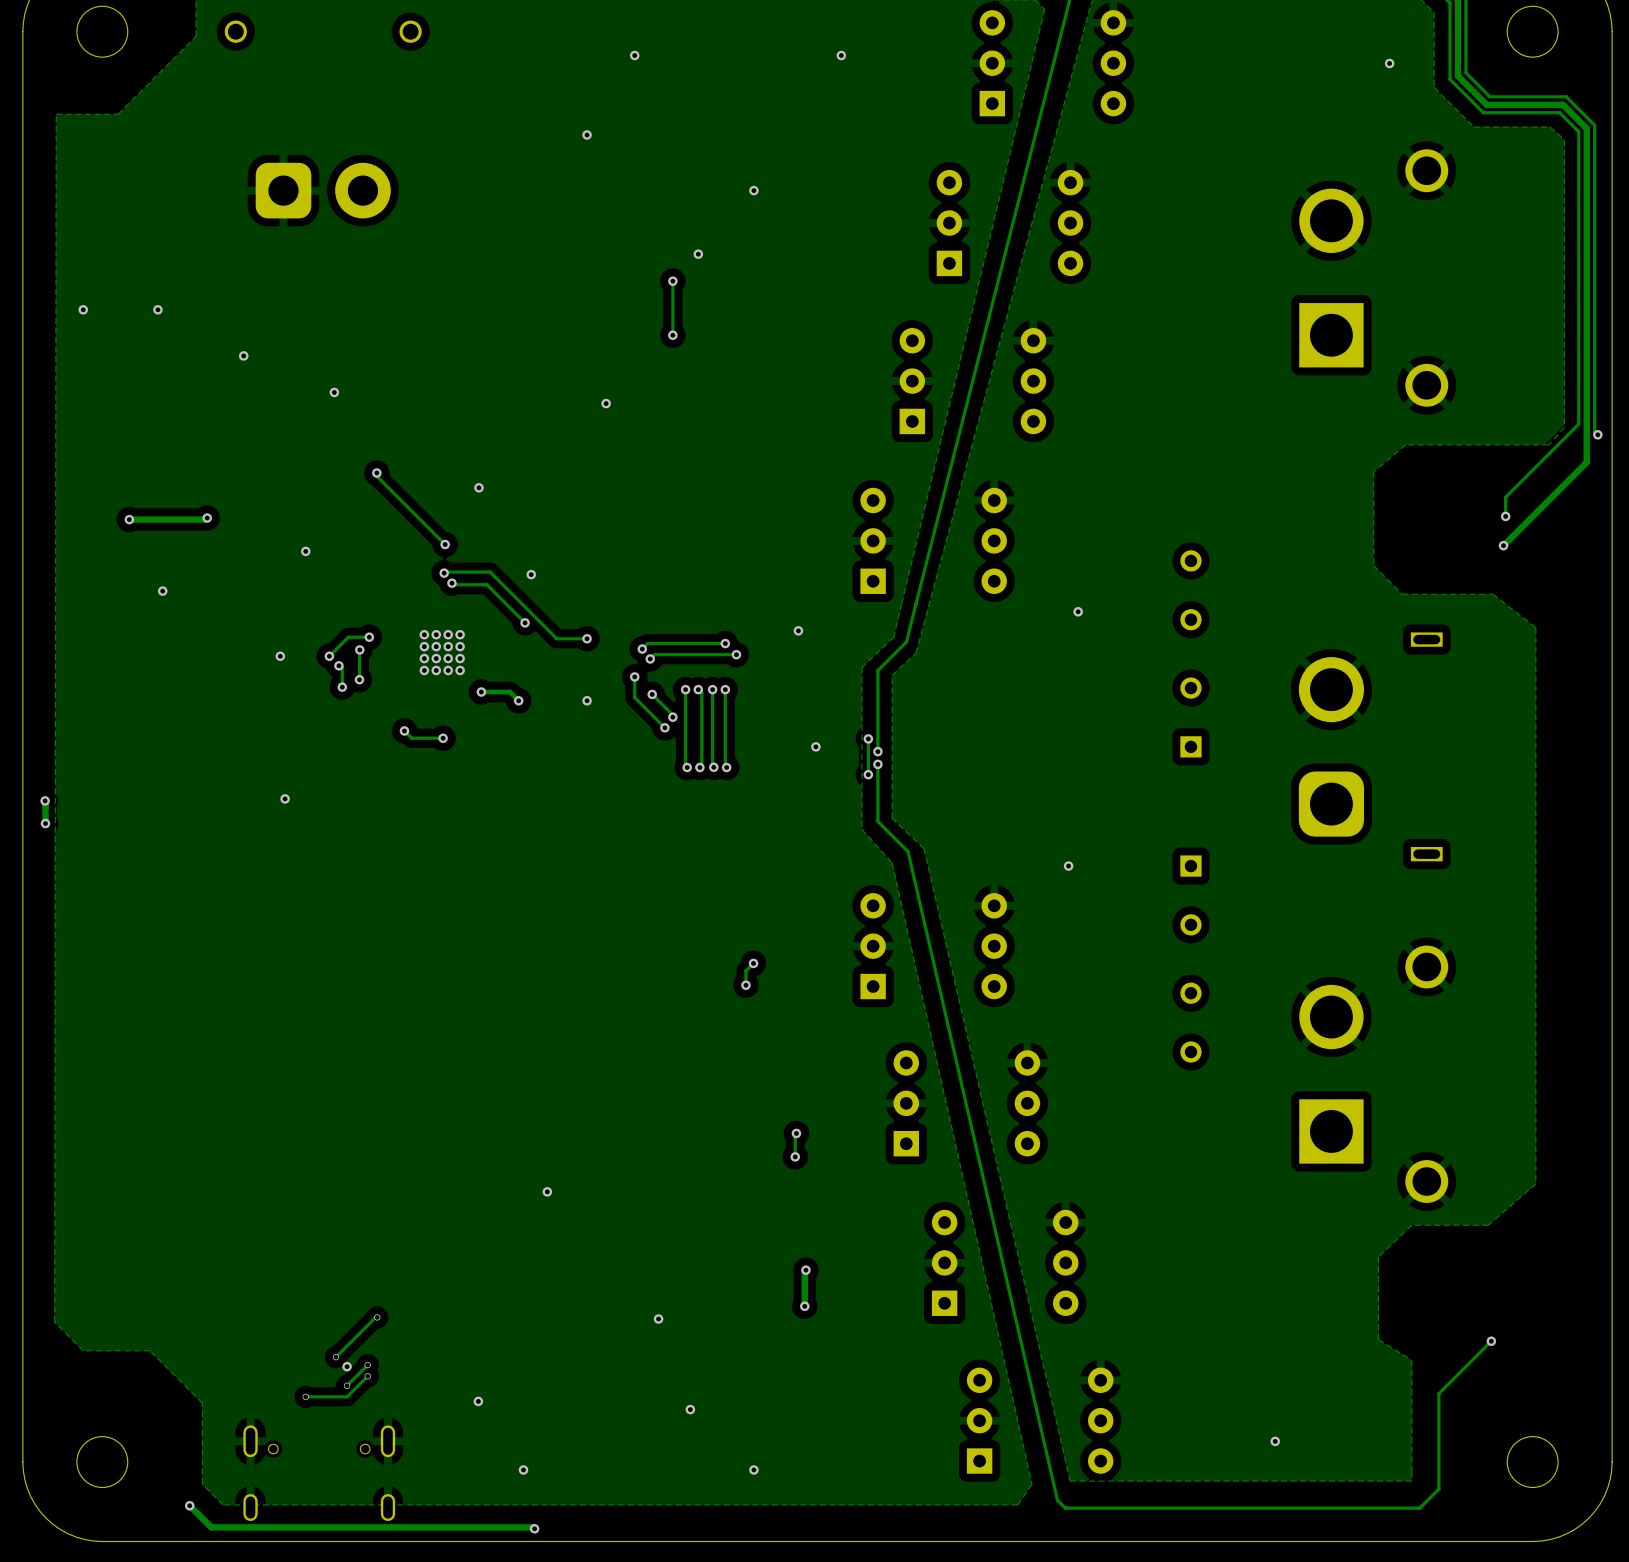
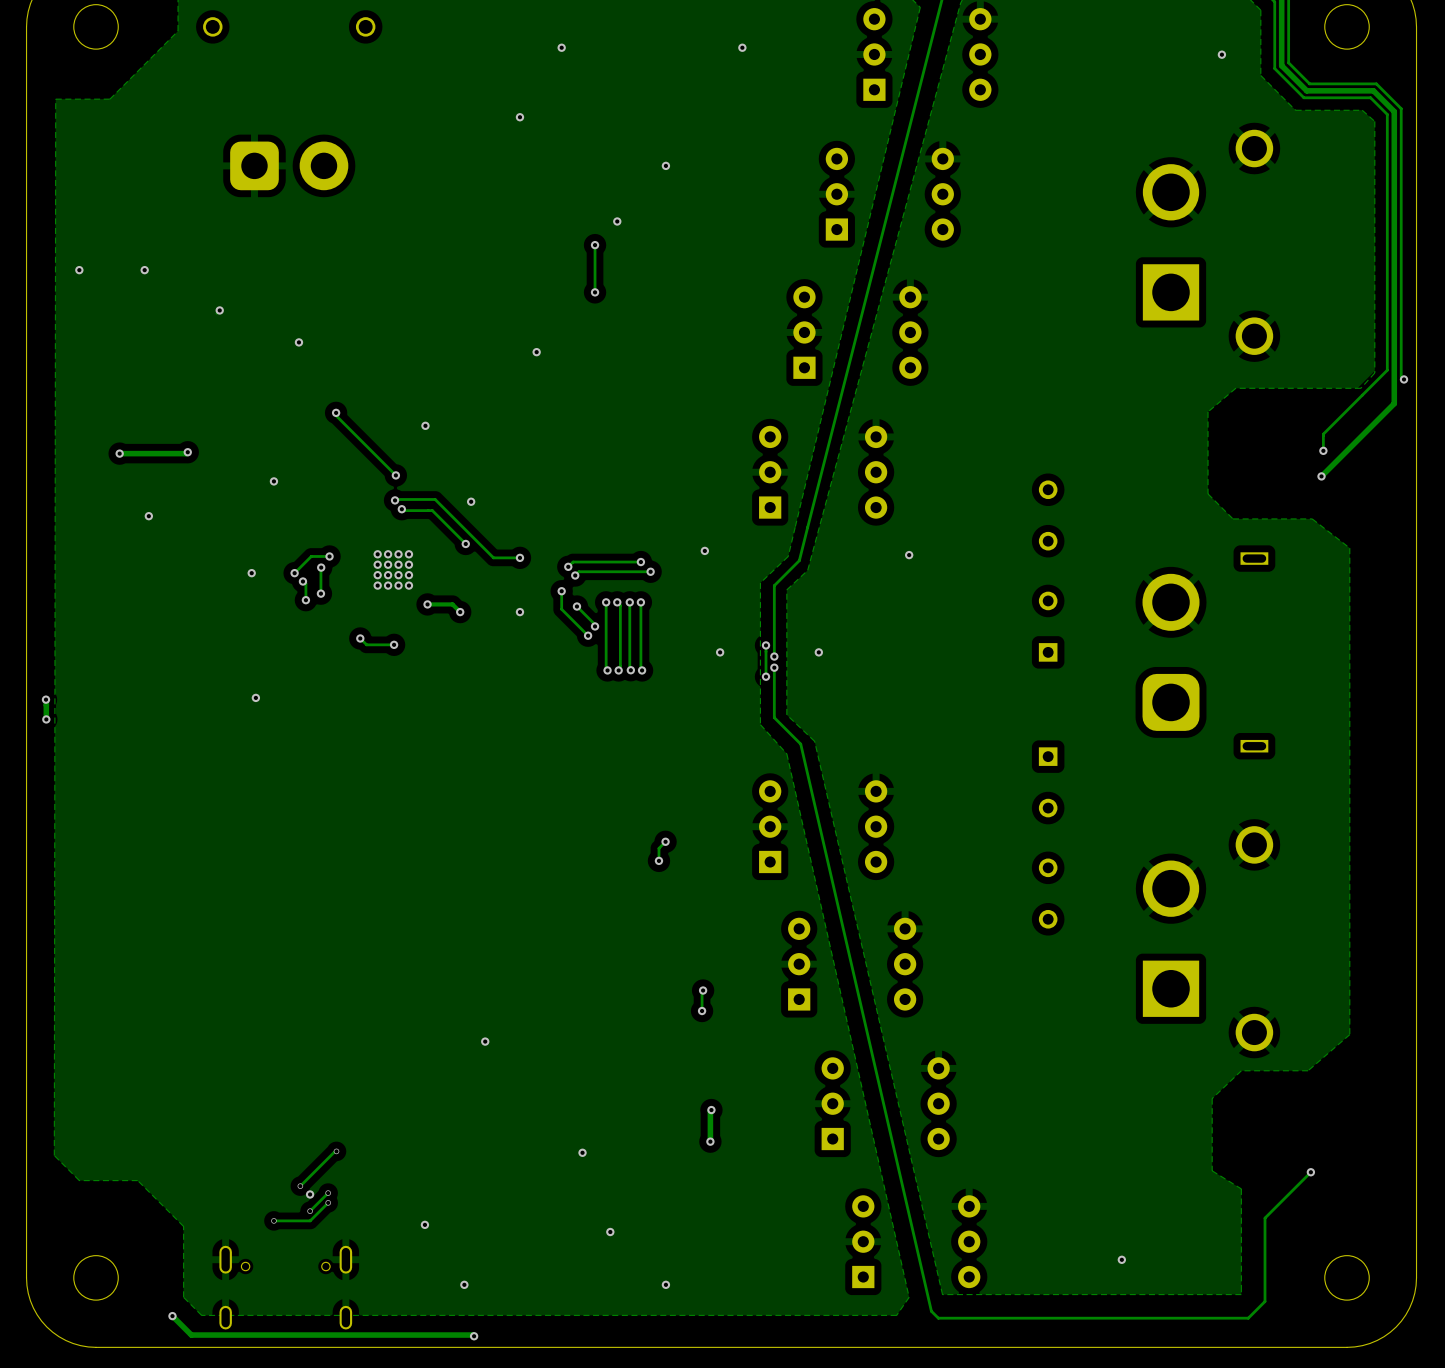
via position: (1078, 611) -> (909, 555)
via: none -> (818, 652)
via: (1068, 866) -> none

